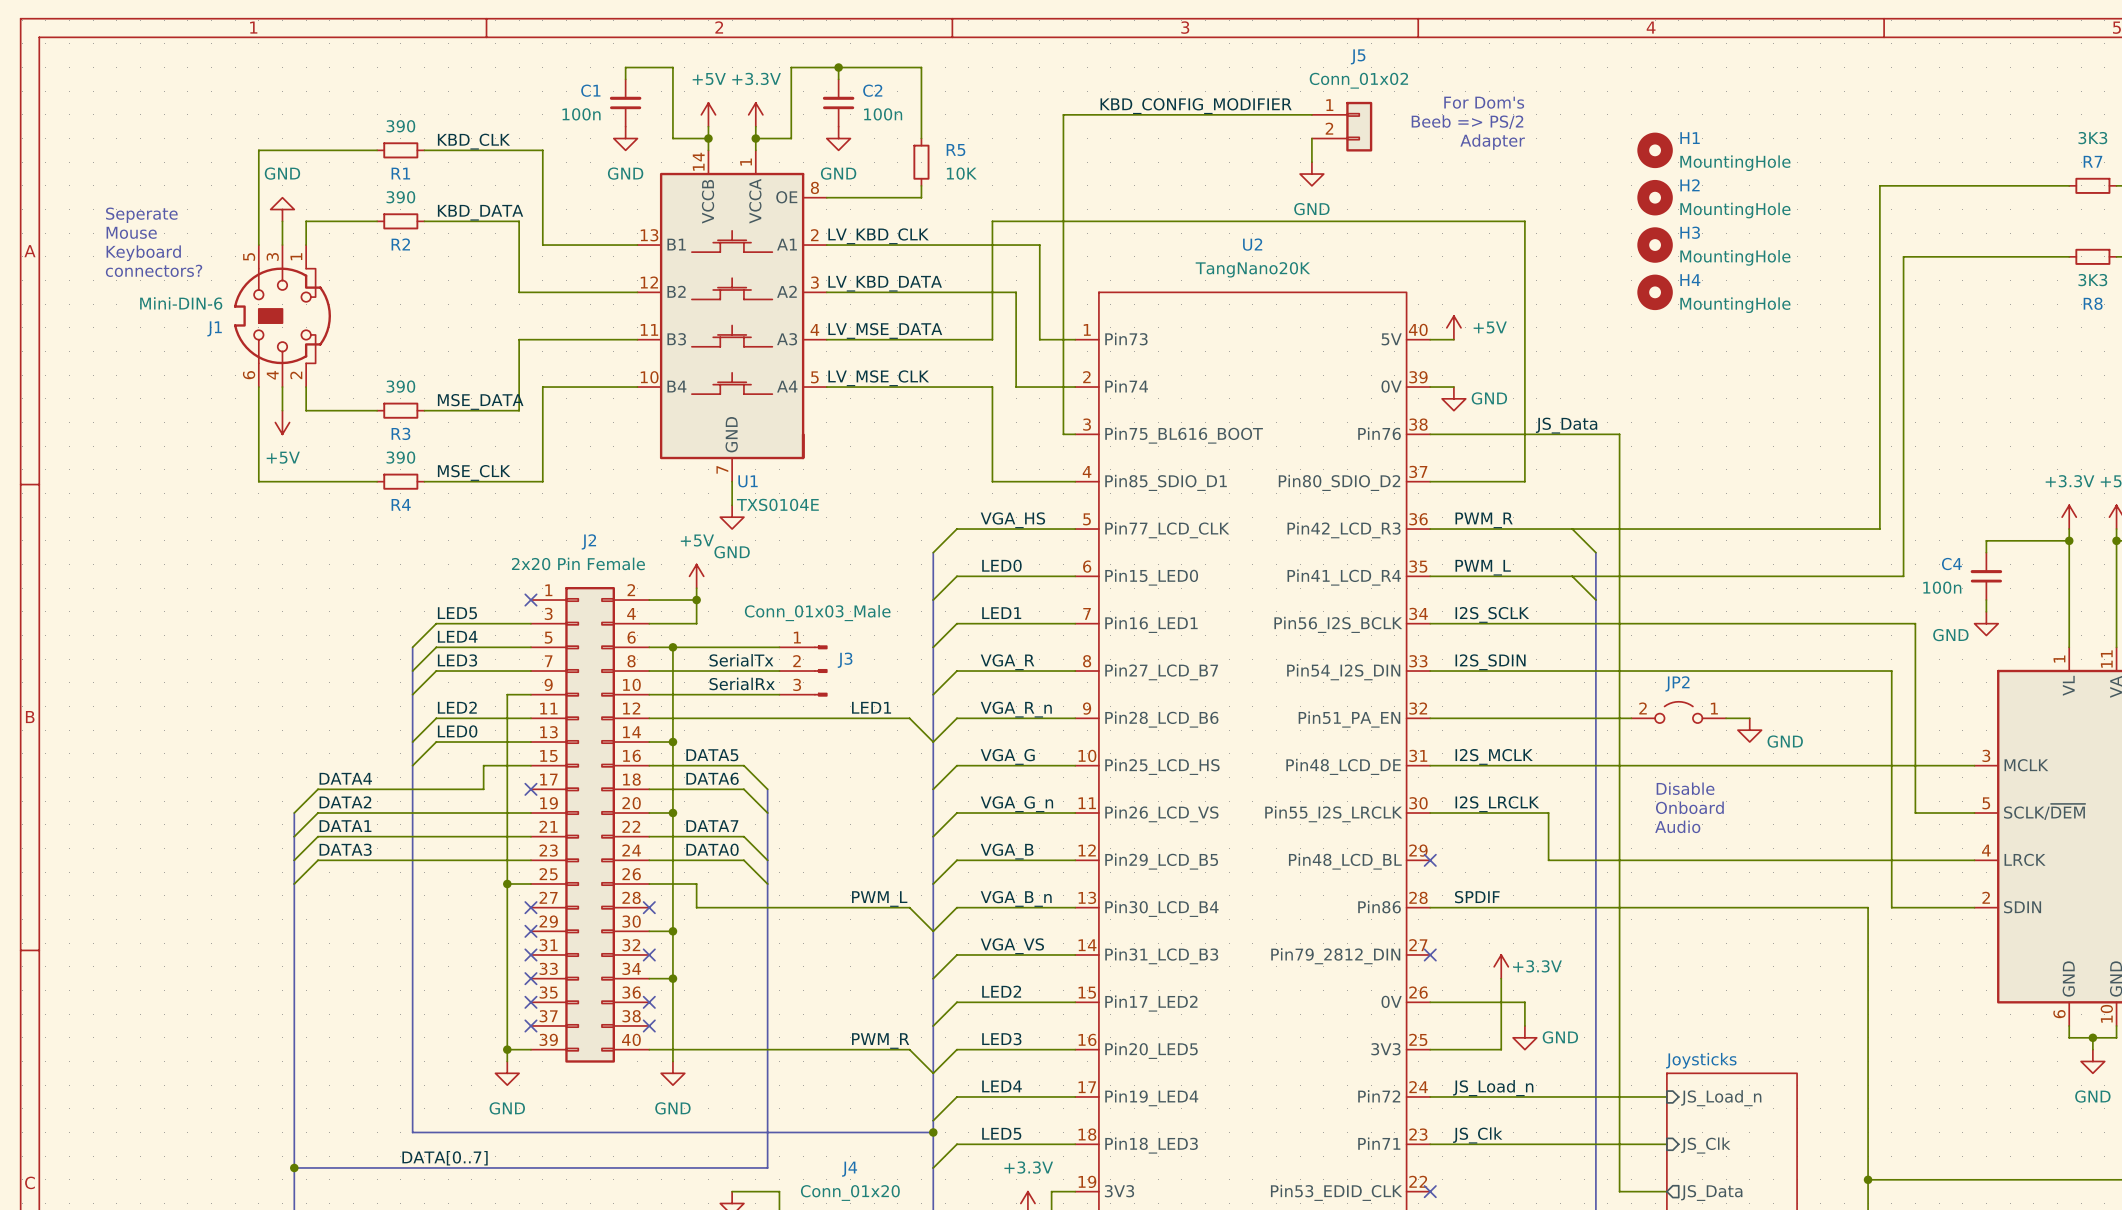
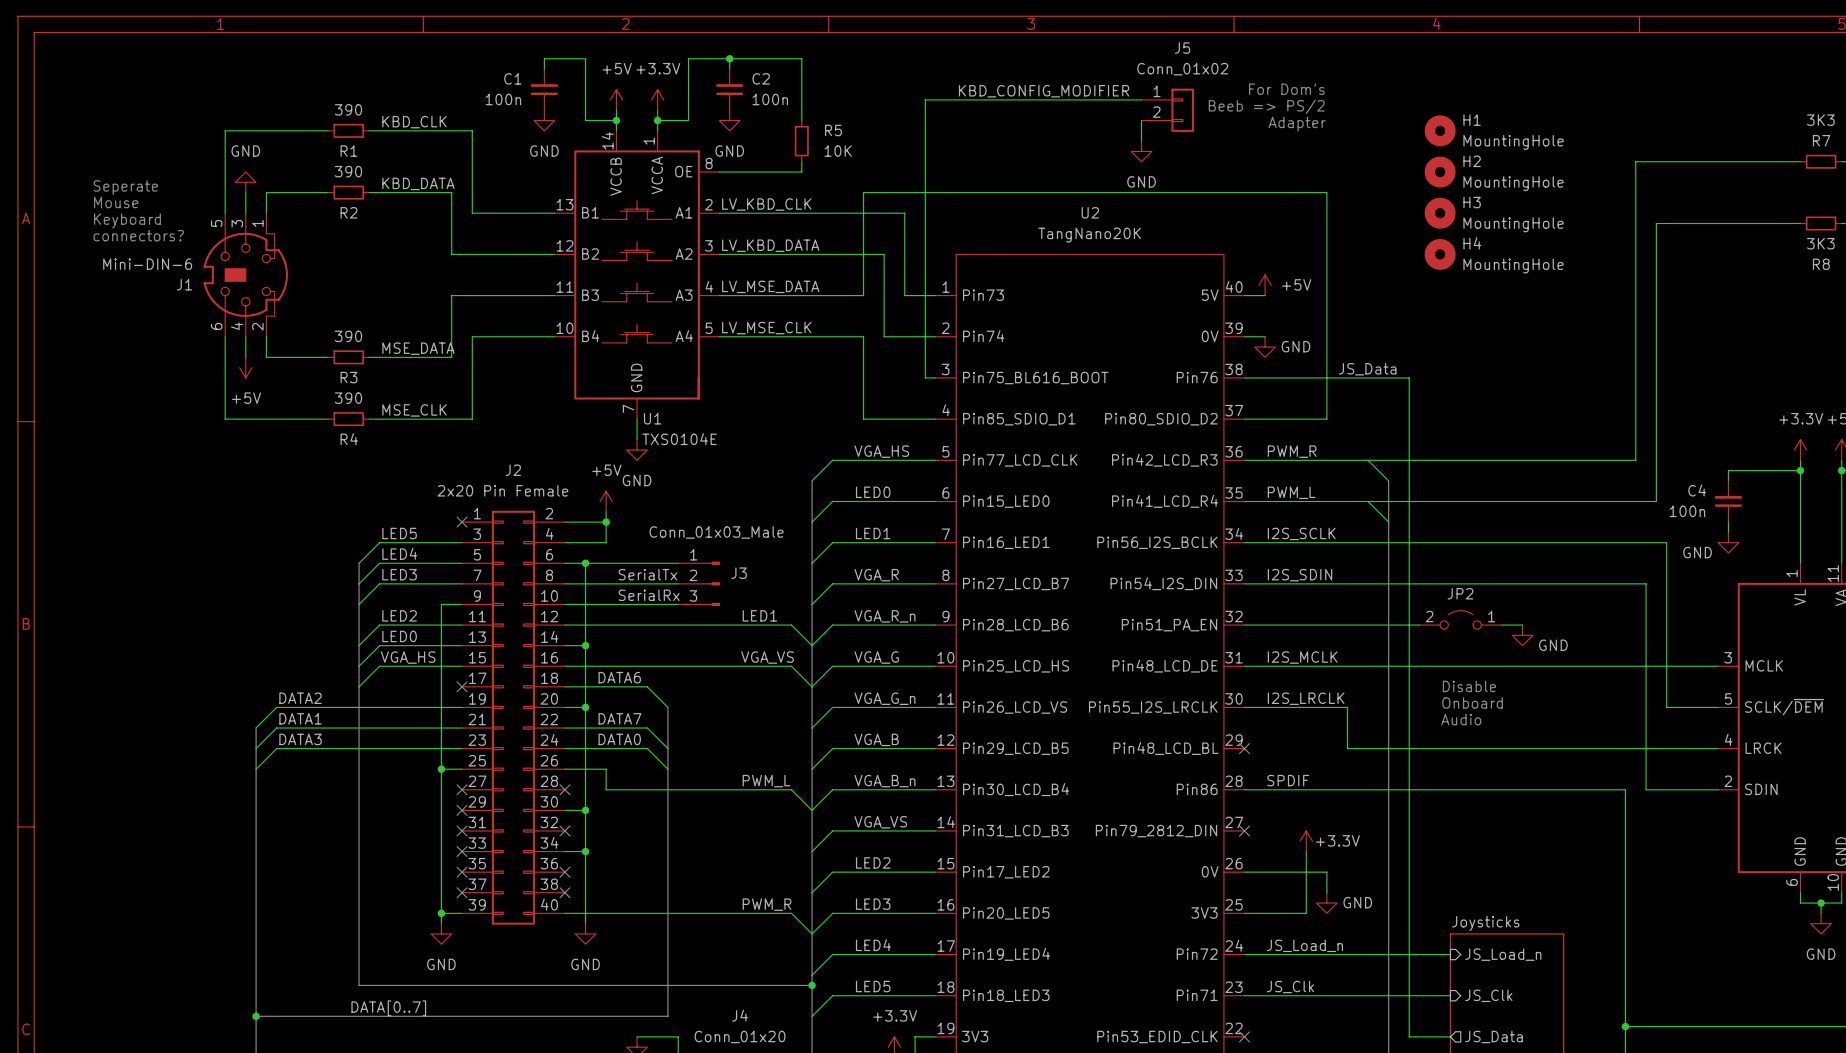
label: DATA5 (712, 755) -> none
label: none -> VGA_HS (408, 657)
label: none -> VGA_VS (767, 657)
wire: (483, 765) (483, 789) (317, 789) (294, 812) -> (420, 666) (379, 666) (359, 686)
wire: (743, 765) (767, 789) -> (647, 666) (791, 666) (812, 686)
label: DATA4 (345, 778) -> none
bus: (767, 789) (767, 812) -> none
bus: (294, 812) (294, 836) -> none

